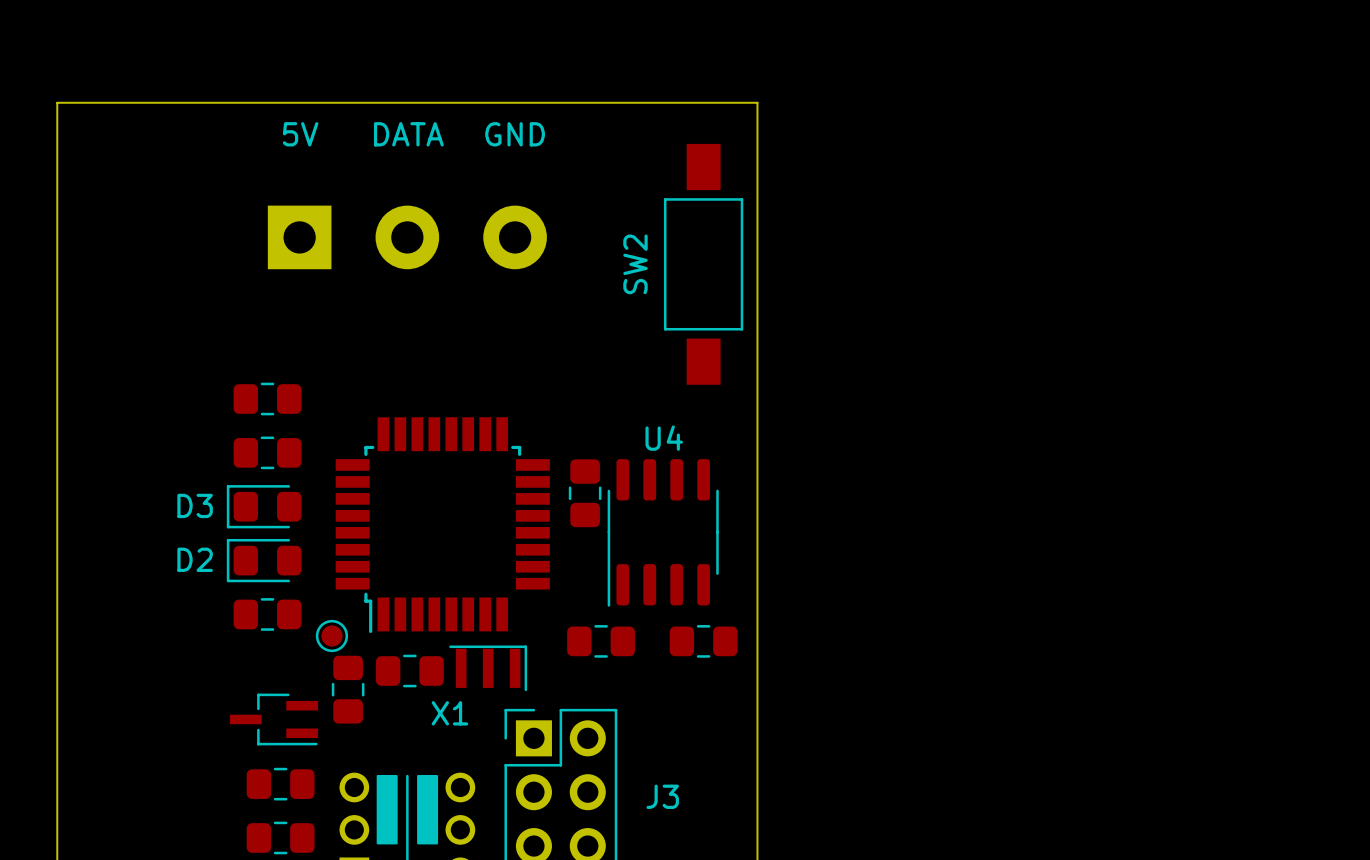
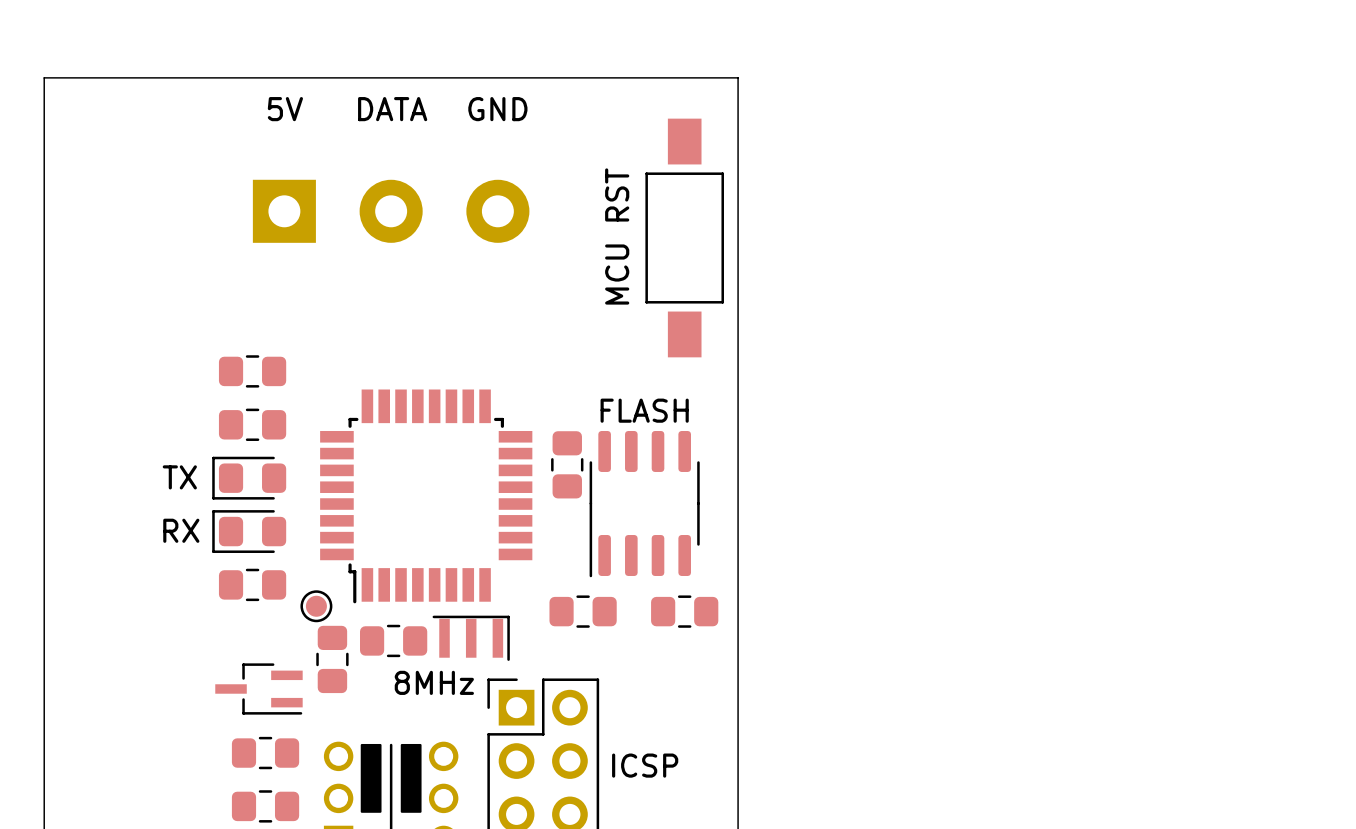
SW2 name: SW2 (635, 264) -> MCU RST (617, 236)
U4 name: U4 (664, 438) -> FLASH (644, 410)
D3 name: D3 (195, 505) -> TX (179, 477)
D2 name: D2 (195, 559) -> RX (181, 530)
X1 name: X1 (449, 713) -> 8MHz (434, 682)
J3 name: J3 (662, 796) -> ICSP (645, 765)

